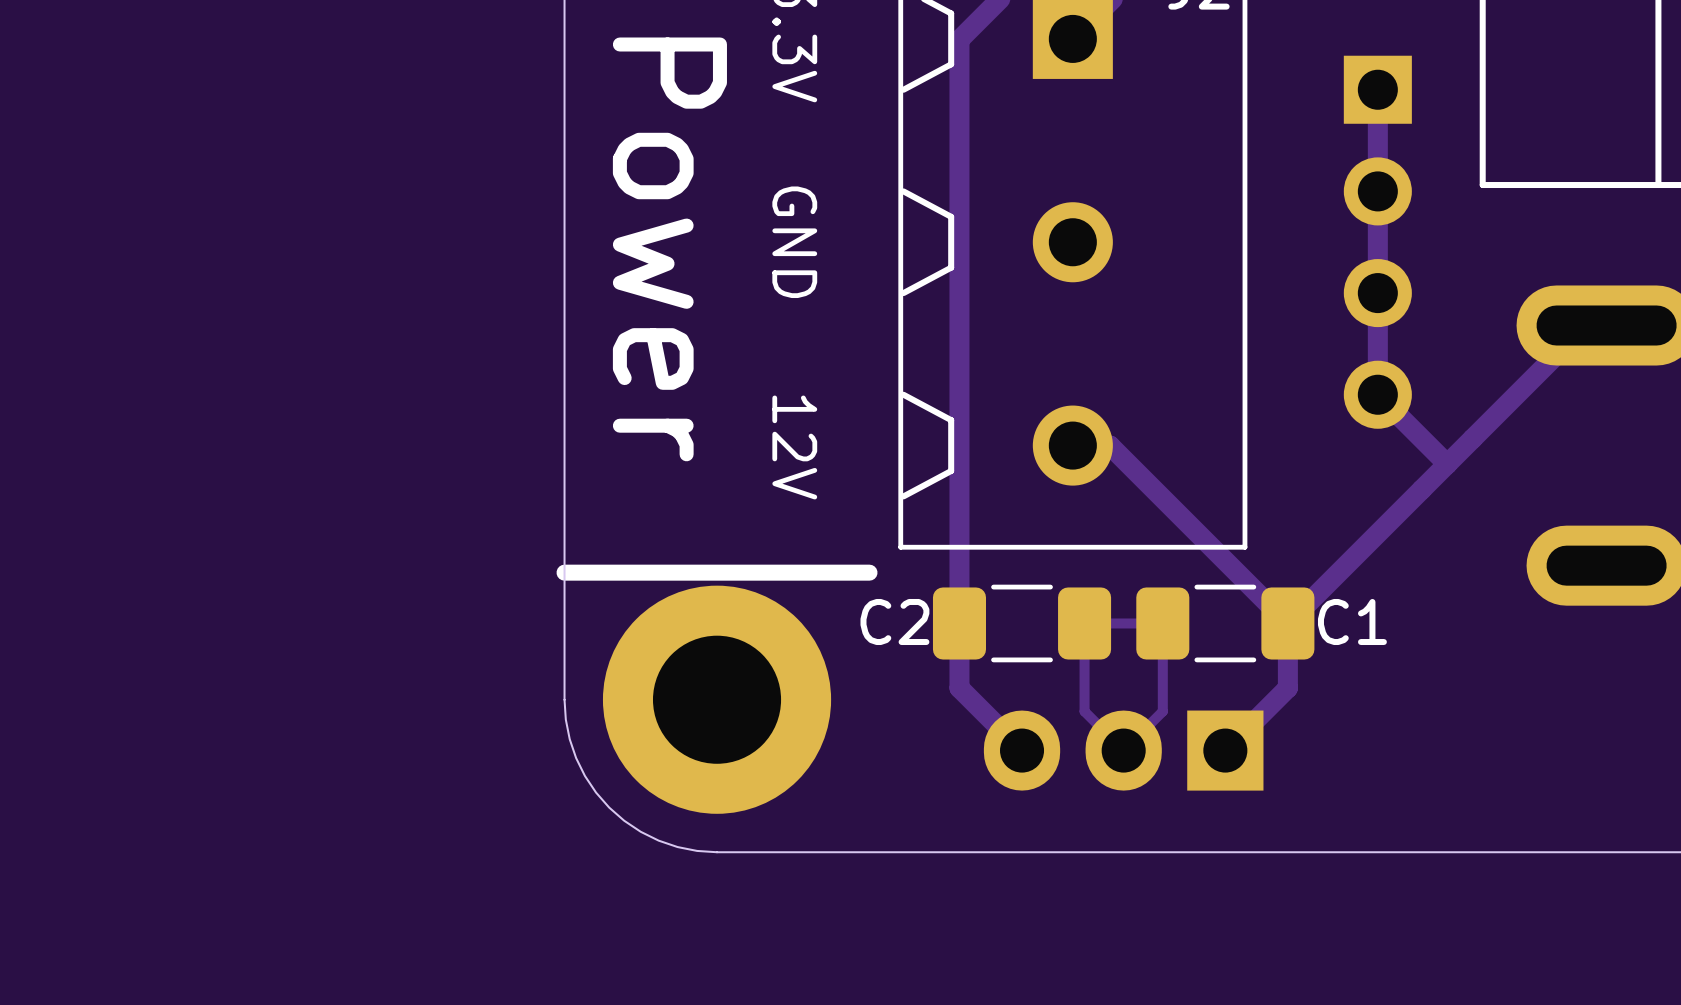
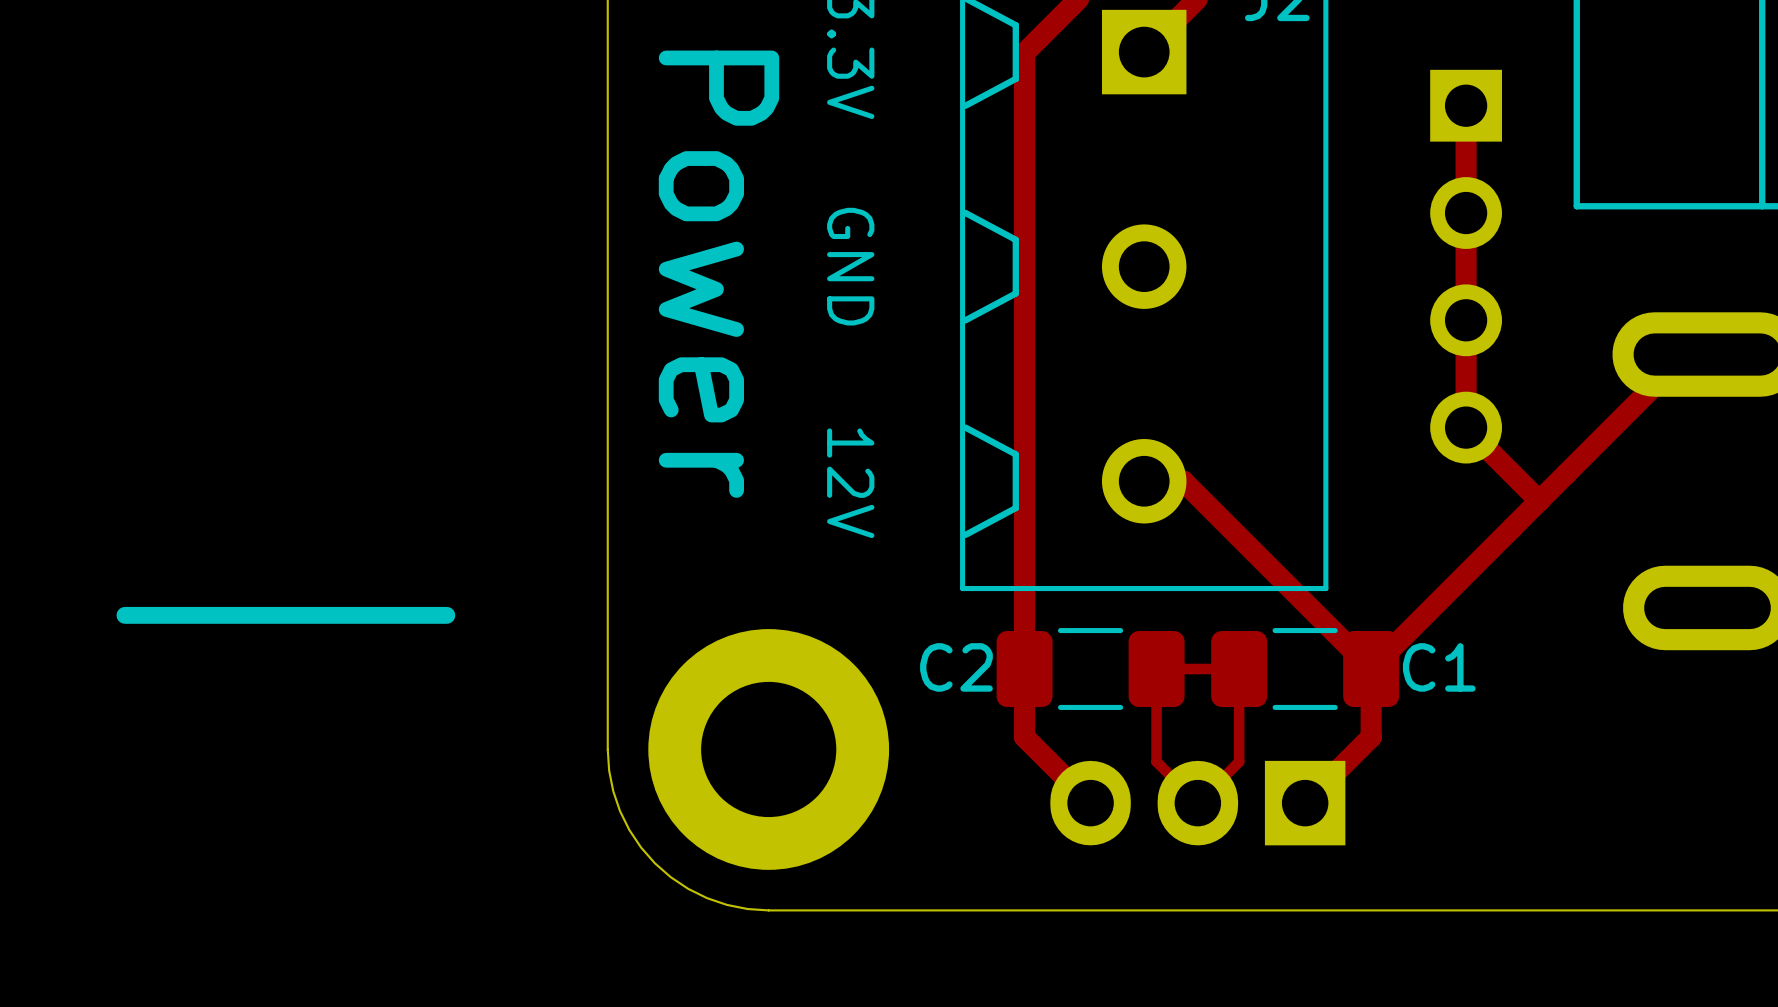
line: (564, 572) (869, 572) -> (124, 615) (446, 615)

